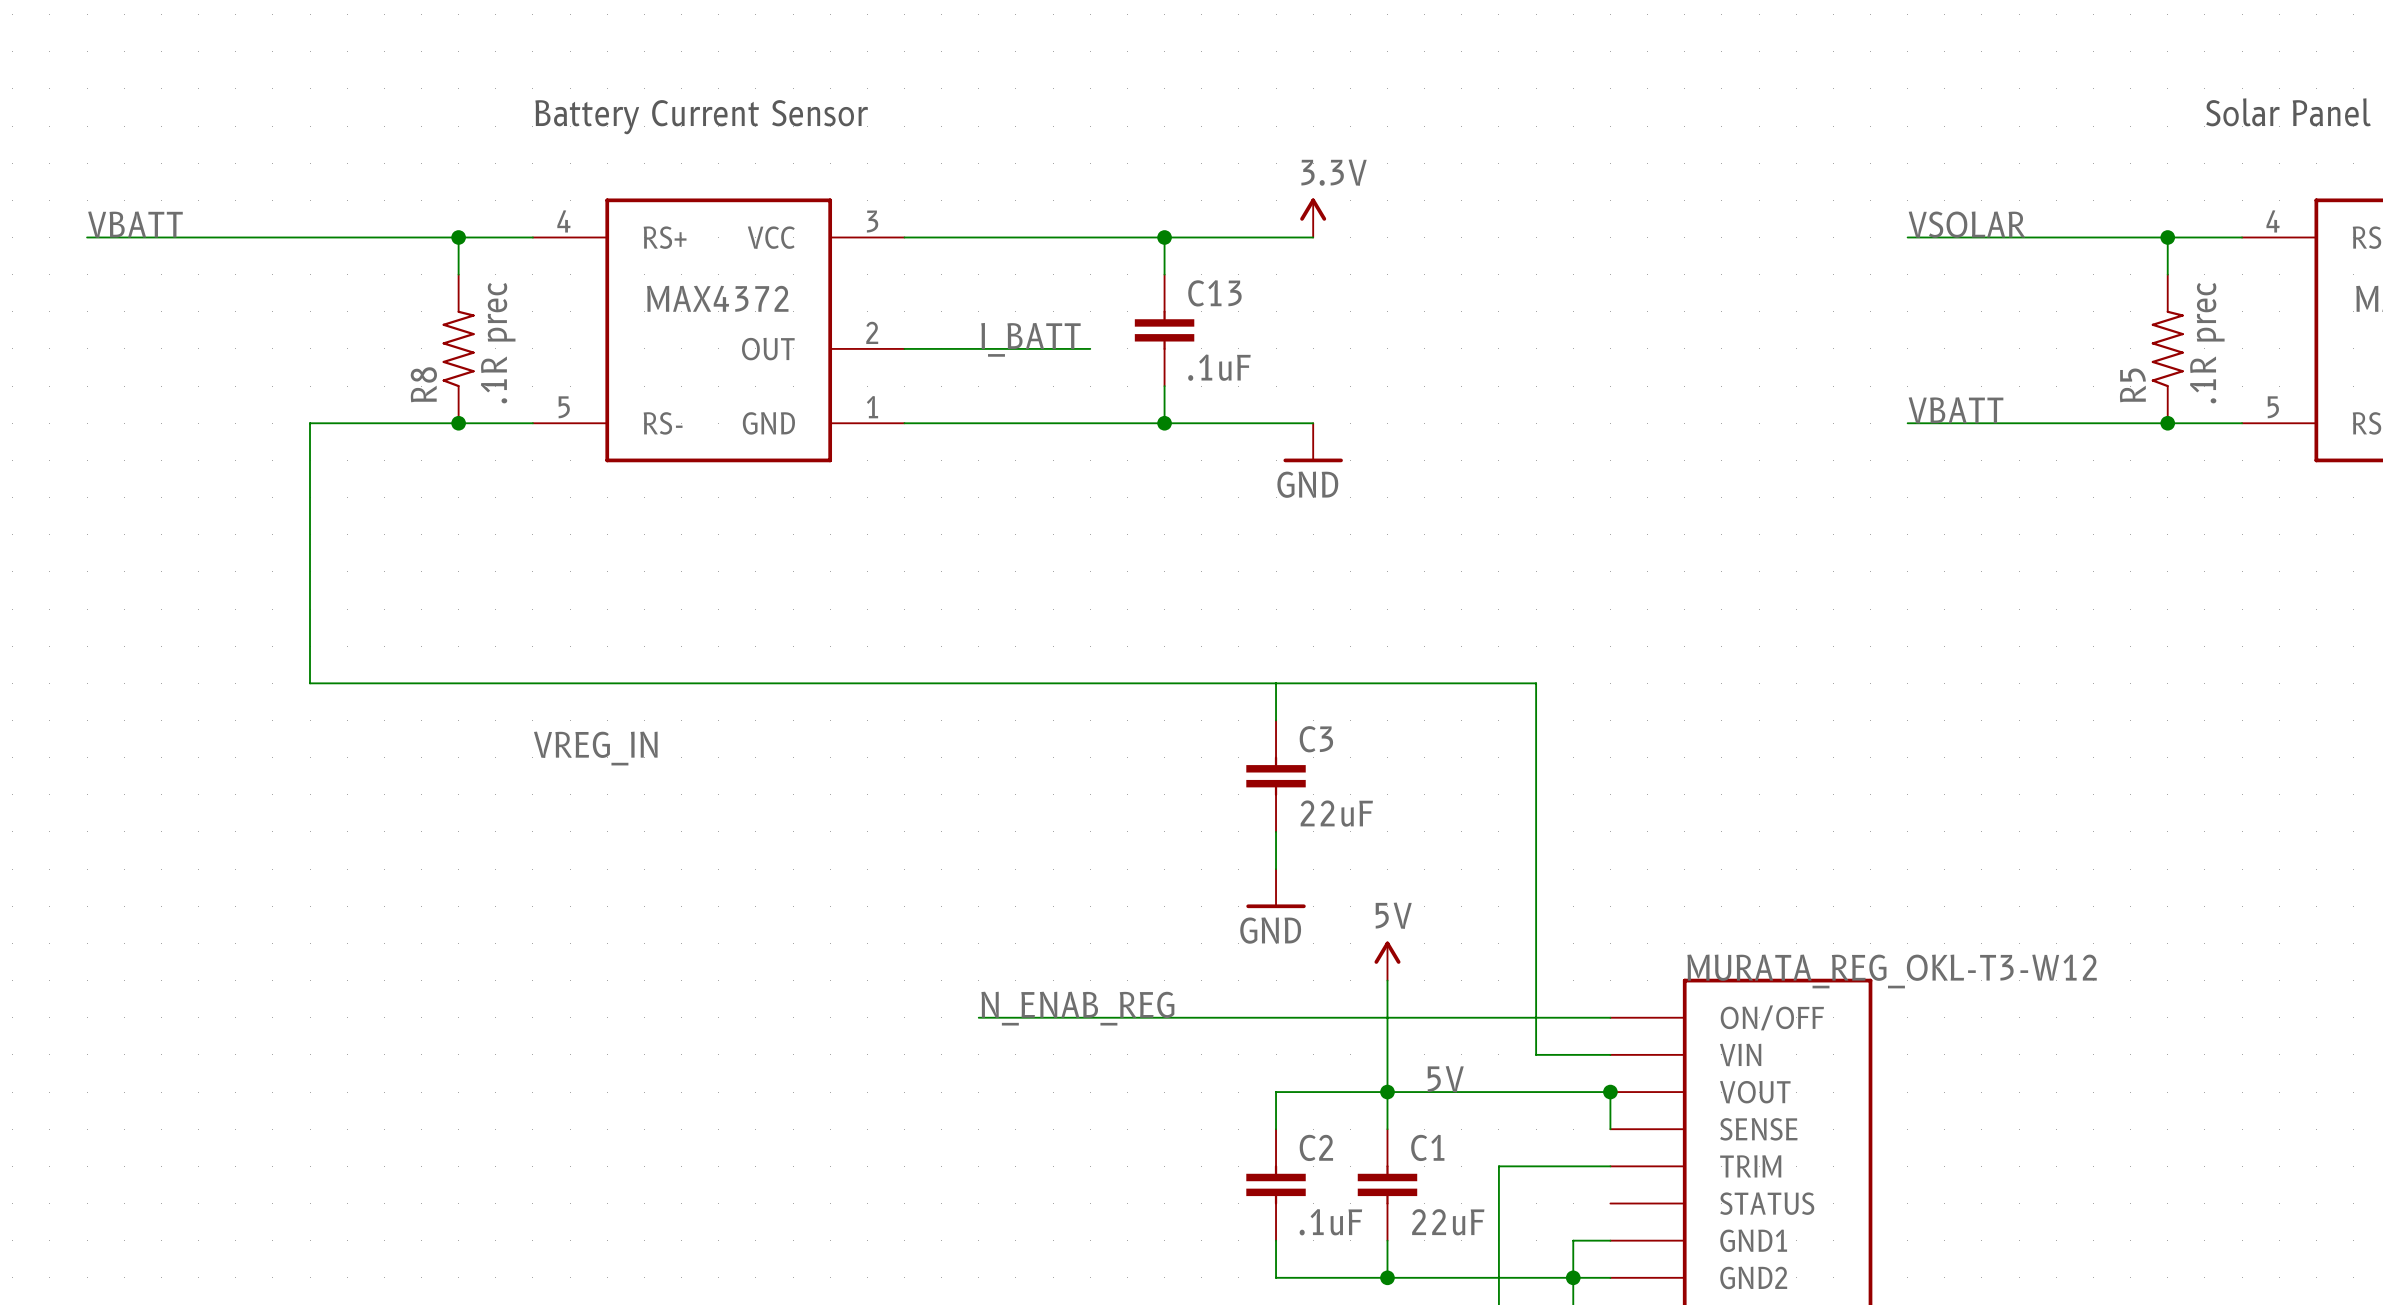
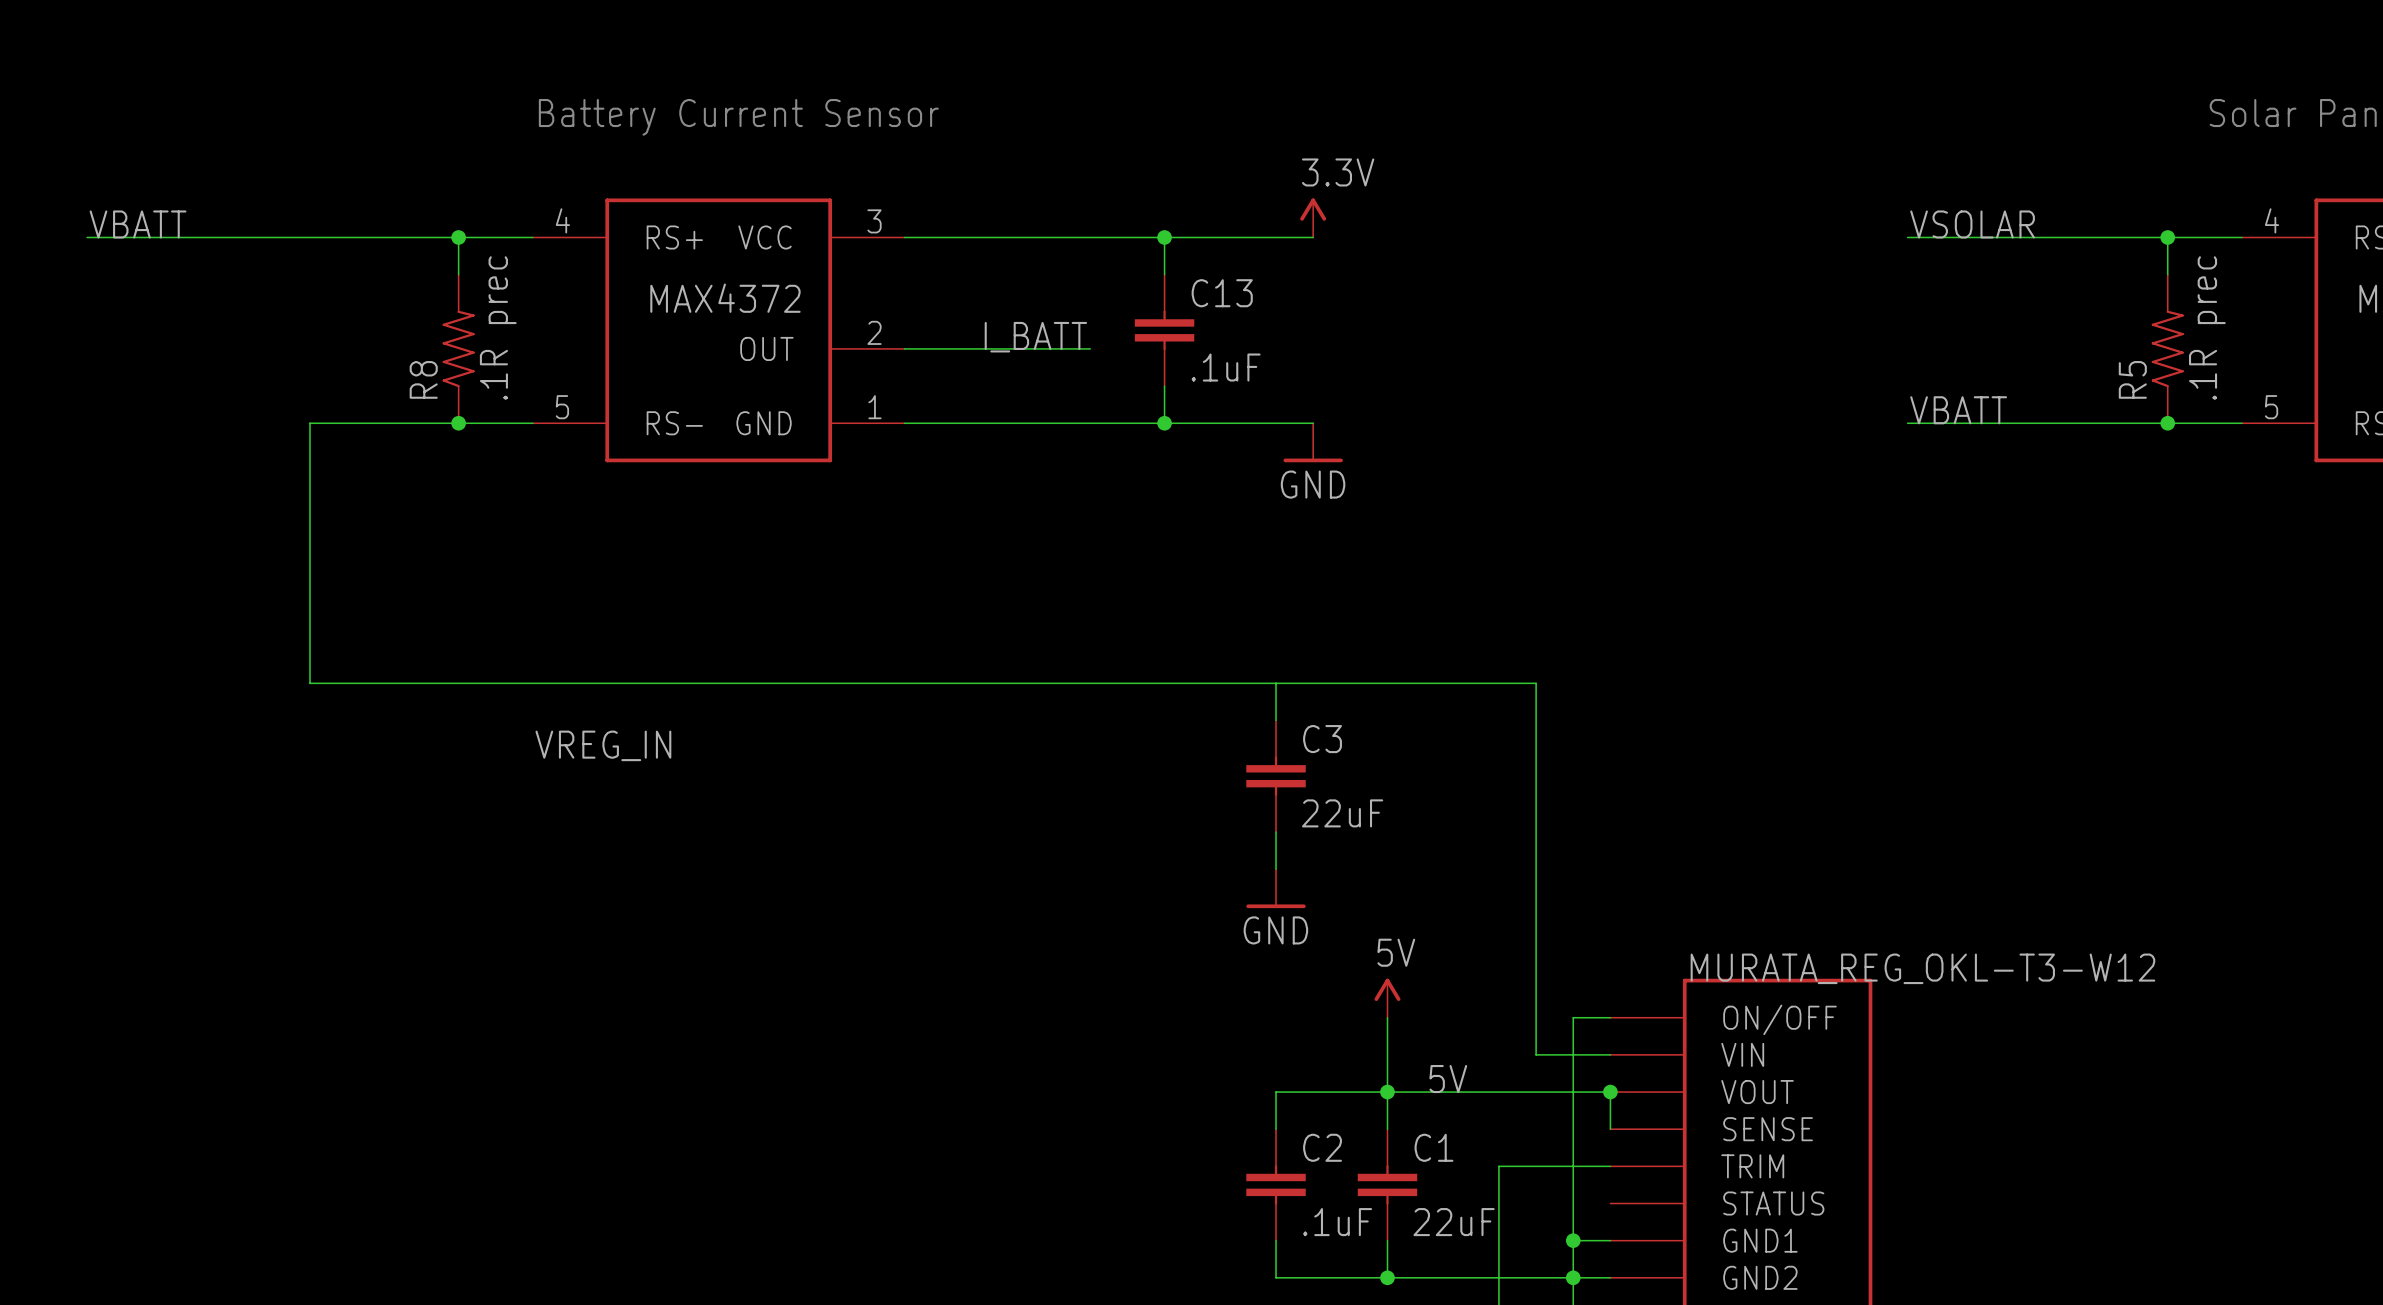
power symbol position: 5V (1387, 961) -> 5V (1387, 998)
label: N_ENAB_REG (1077, 1008) -> none
wire: (978, 1017) (1573, 1017) -> (1573, 1240) (1573, 1017)
junction: none -> (1573, 1240)

